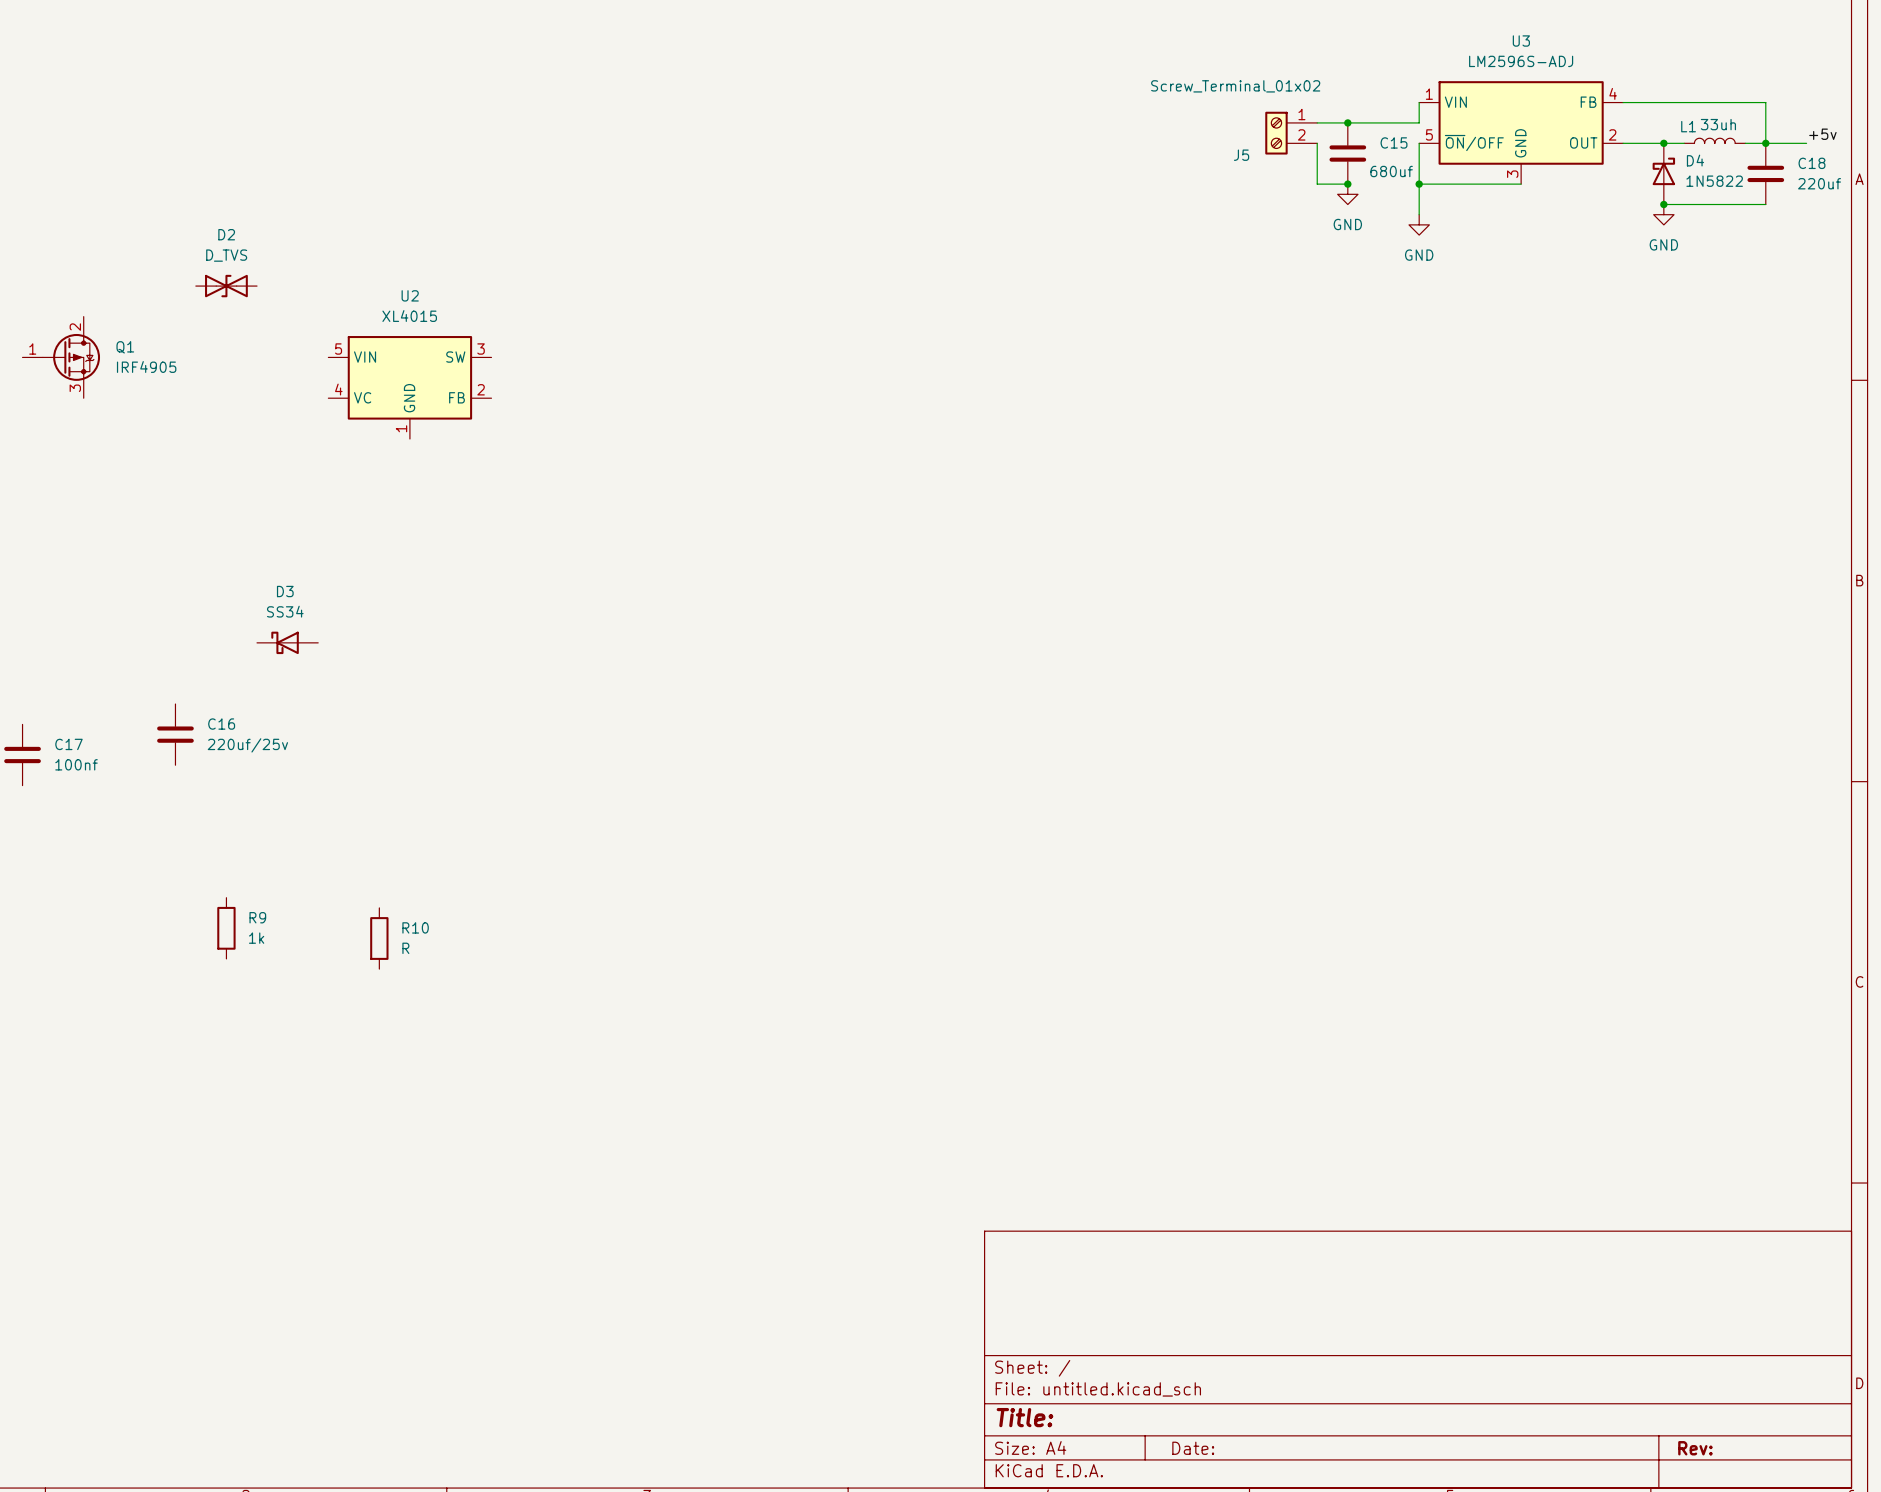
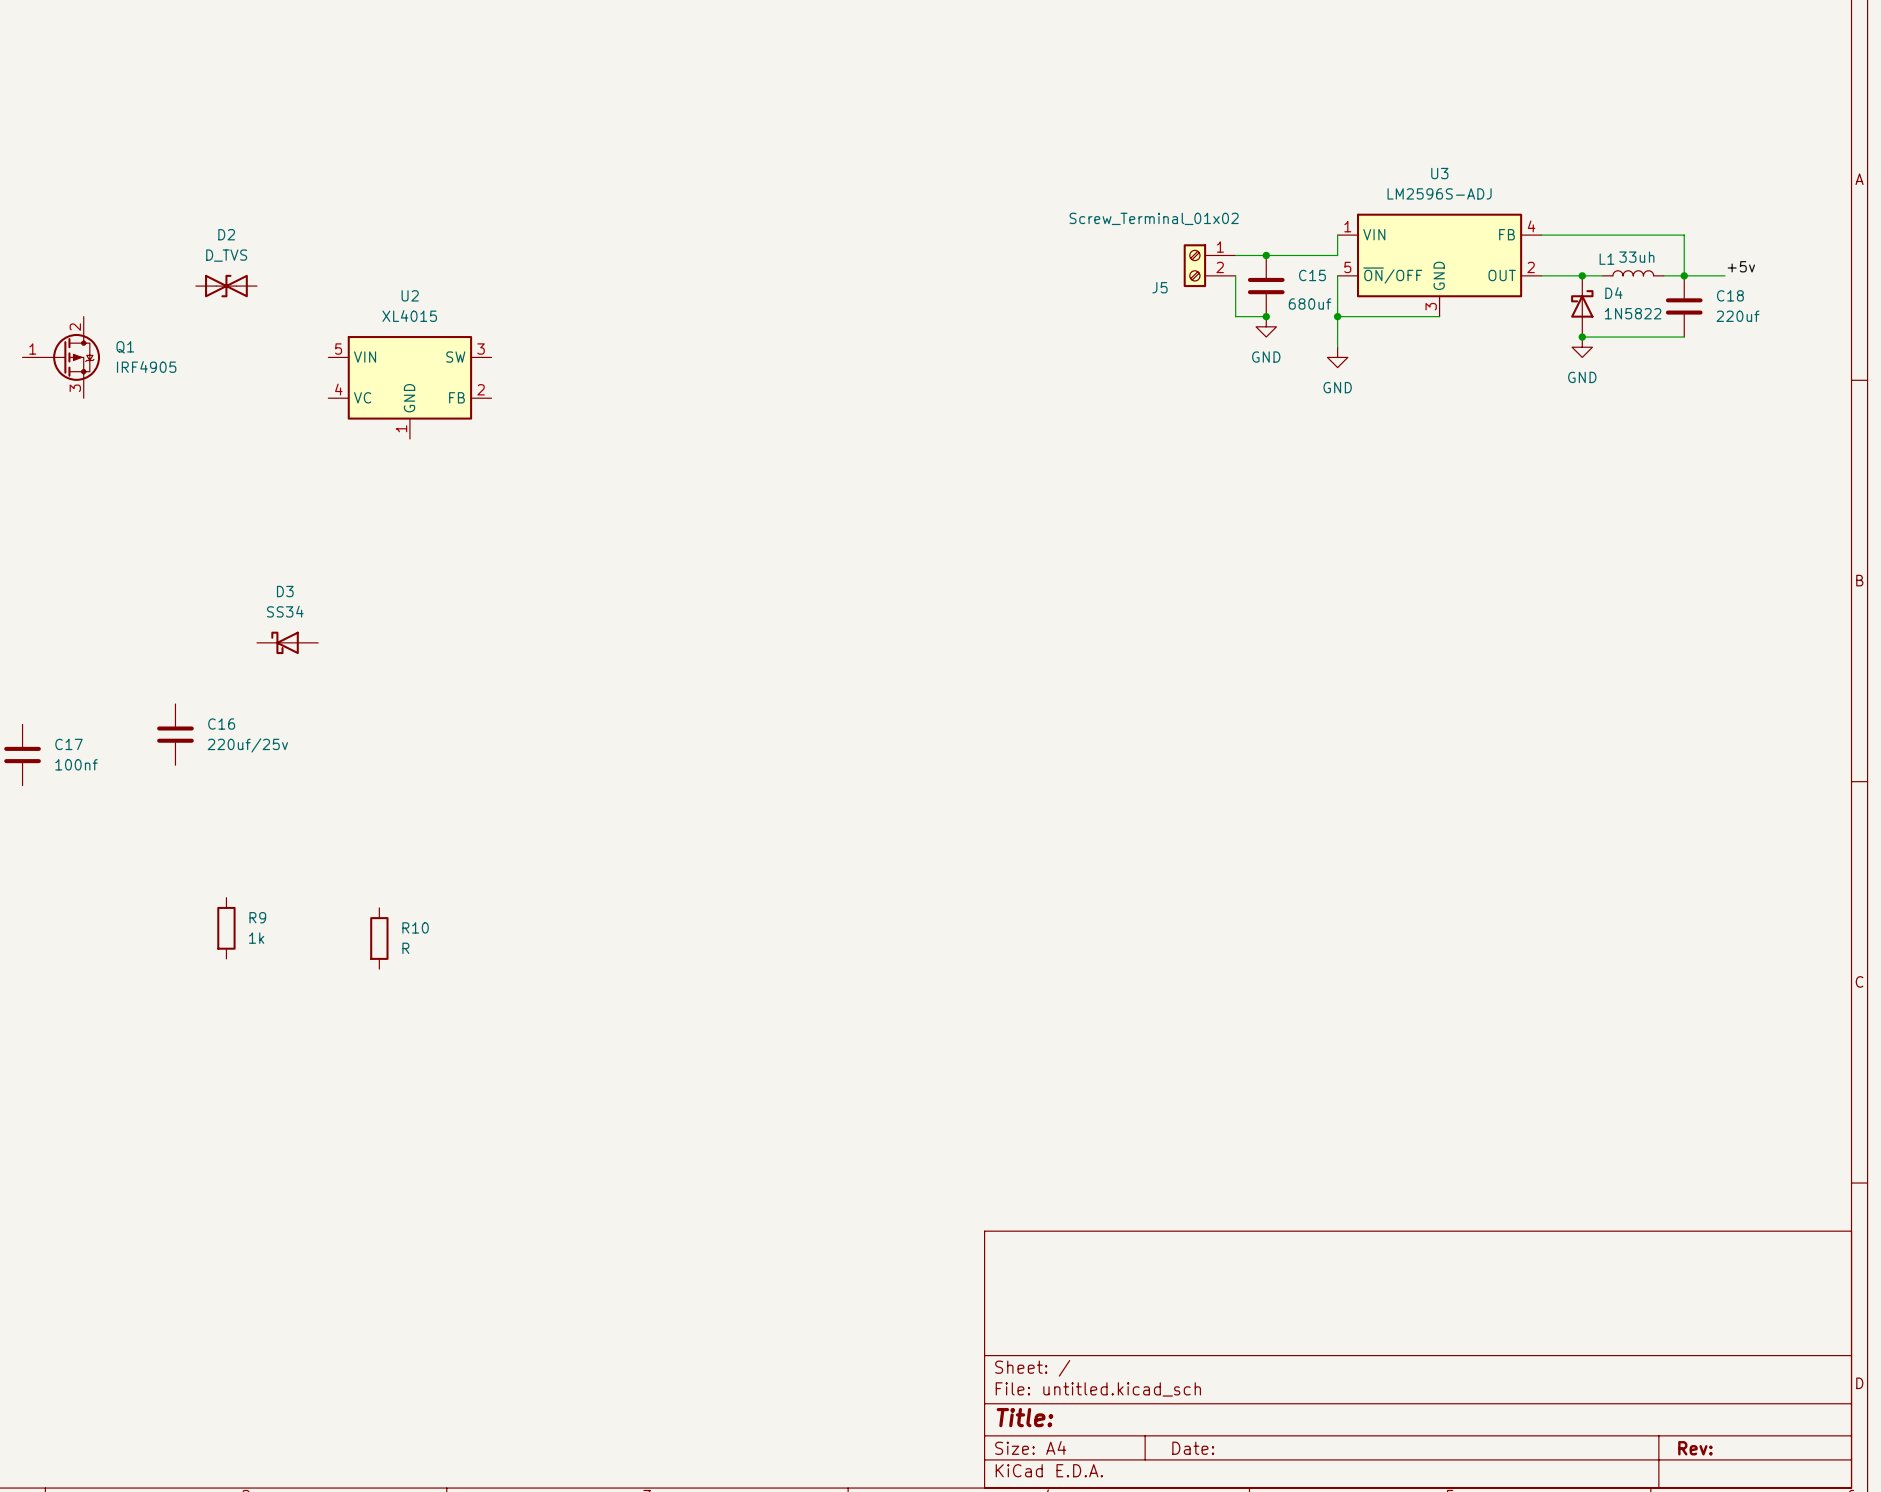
wire: (1419, 102) (1419, 122) (1317, 122) -> (1337, 235) (1337, 255) (1235, 255)
wire: (1623, 102) (1765, 102) (1765, 143) -> (1541, 235) (1684, 235) (1684, 275)
junction: (1347, 122) -> none
U3 position: (1521, 132) -> (1439, 265)
J5 position: (1291, 133) -> (1209, 265)
label position: +5v (1822, 134) -> +5v (1741, 266)
L1 position: (1714, 140) -> (1633, 273)
wire: (1317, 143) (1317, 184) (1347, 184) -> (1235, 275) (1235, 316) (1266, 316)
wire: (1419, 143) (1419, 214) -> (1337, 275) (1337, 347)
wire: (1623, 143) (1684, 143) -> (1541, 275) (1602, 275)
junction: (1663, 143) -> none
wire: (1745, 143) (1806, 143) -> (1663, 275) (1725, 275)
junction: (1765, 143) -> none
C15 position: (1347, 153) -> (1266, 286)
D4 position: (1663, 173) -> (1582, 306)
C18 position: (1765, 173) -> (1684, 306)
junction: (1347, 184) -> none
wire: (1419, 184) (1521, 184) -> (1337, 316) (1439, 316)
junction: (1419, 184) -> none
power symbol: GND (1347, 194) -> none
wire: (1663, 204) (1765, 204) -> (1582, 337) (1684, 337)
junction: (1663, 204) -> none
power symbol: GND (1663, 214) -> none
power symbol: GND (1419, 224) -> none
junction: none -> (1266, 255)
junction: none -> (1582, 275)
junction: none -> (1684, 275)
junction: none -> (1266, 316)
junction: none -> (1337, 316)
power symbol: none -> GND (1266, 326)
junction: none -> (1582, 337)
power symbol: none -> GND (1582, 347)
power symbol: none -> GND (1337, 357)

